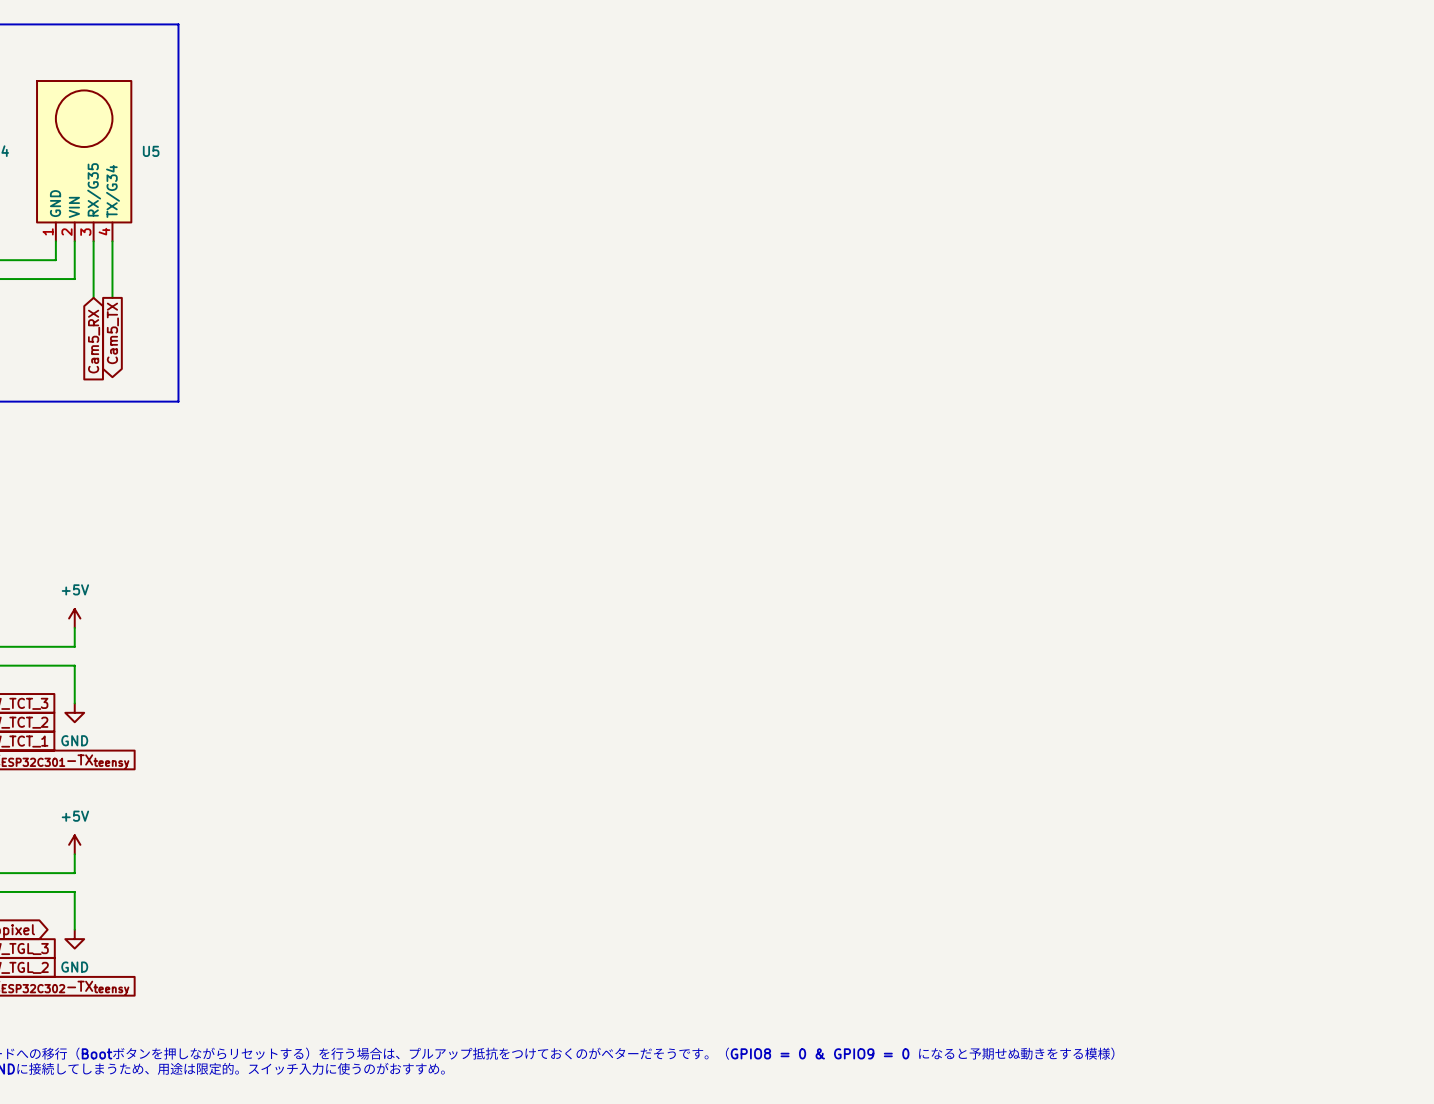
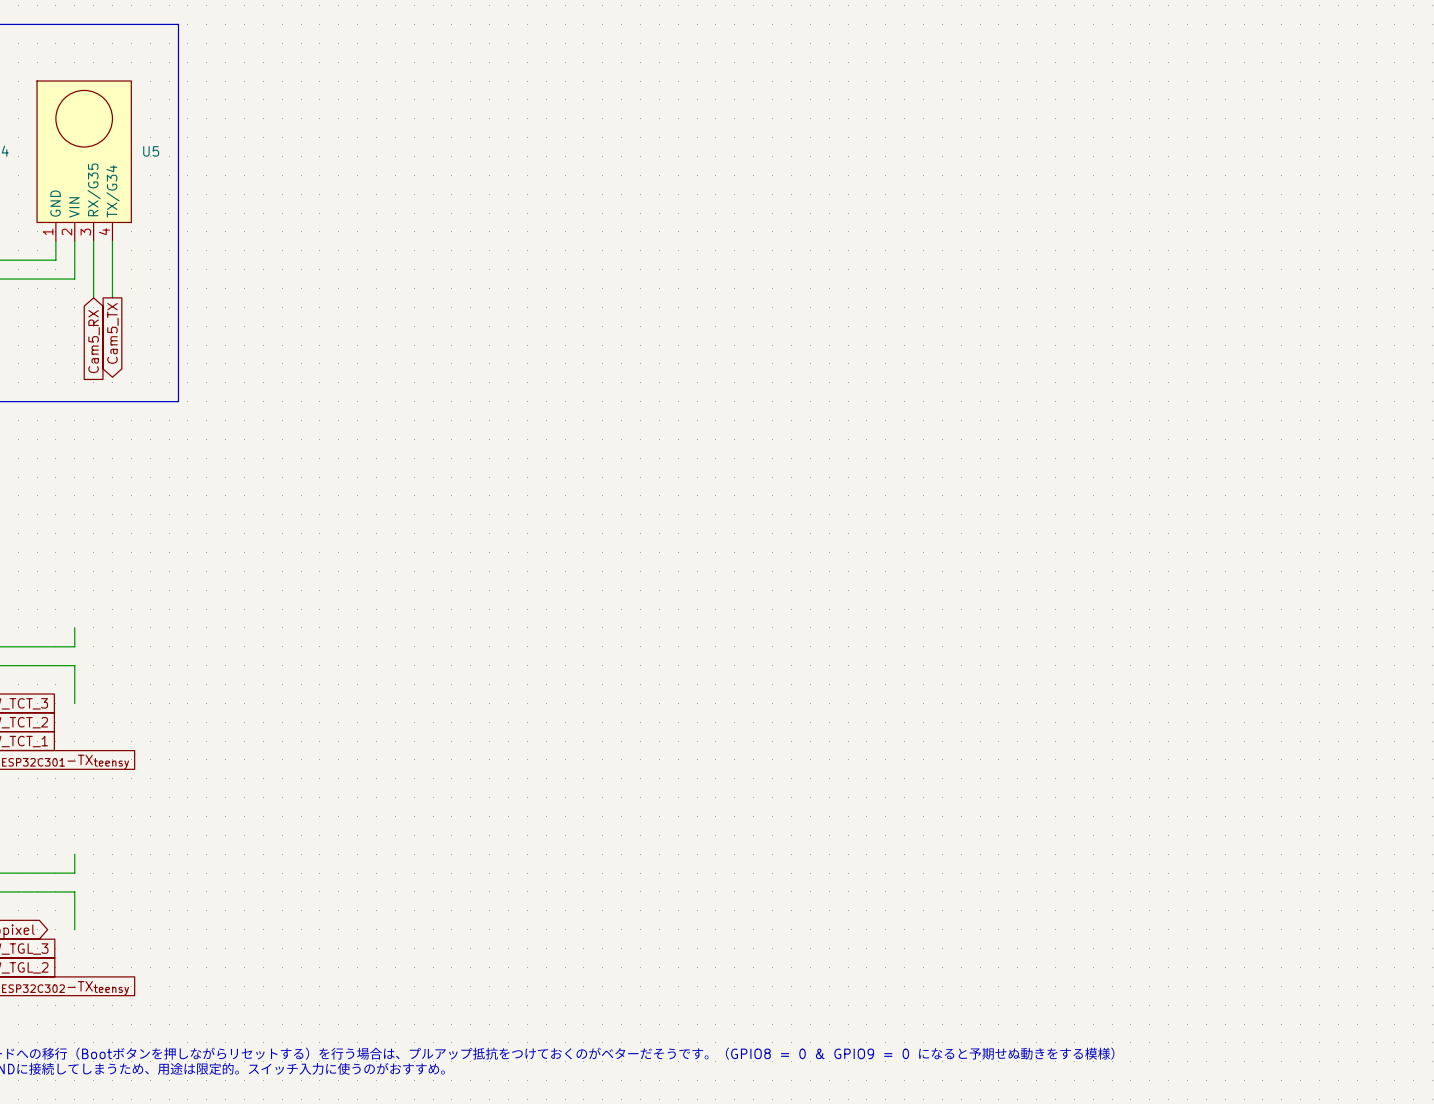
power symbol: +5V (74, 618) -> none
power symbol: GND (74, 712) -> none
power symbol: +5V (74, 844) -> none
power symbol: GND (74, 939) -> none

